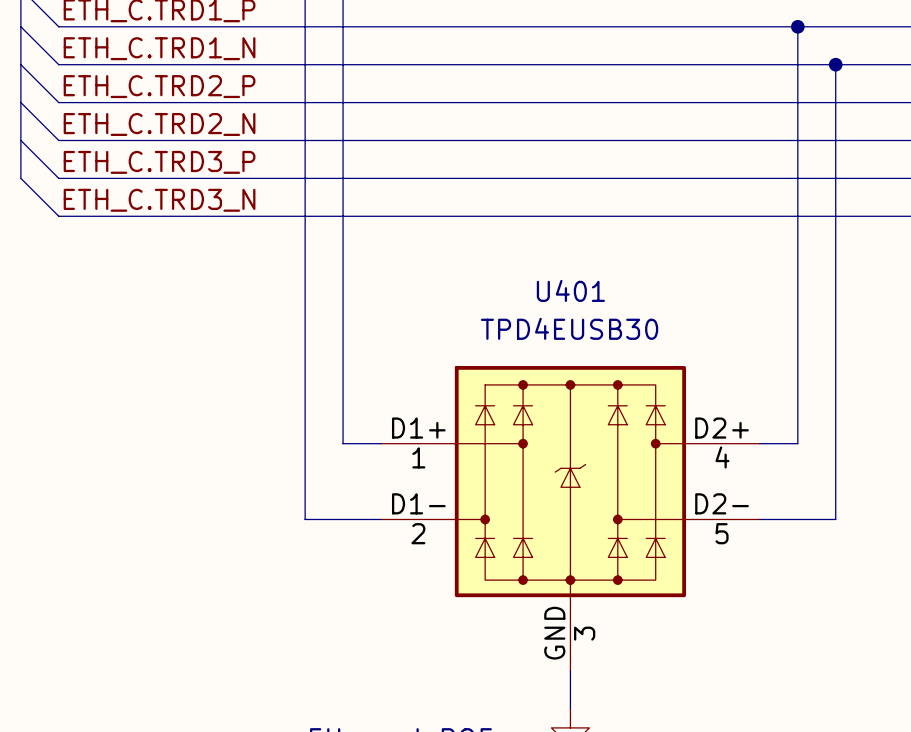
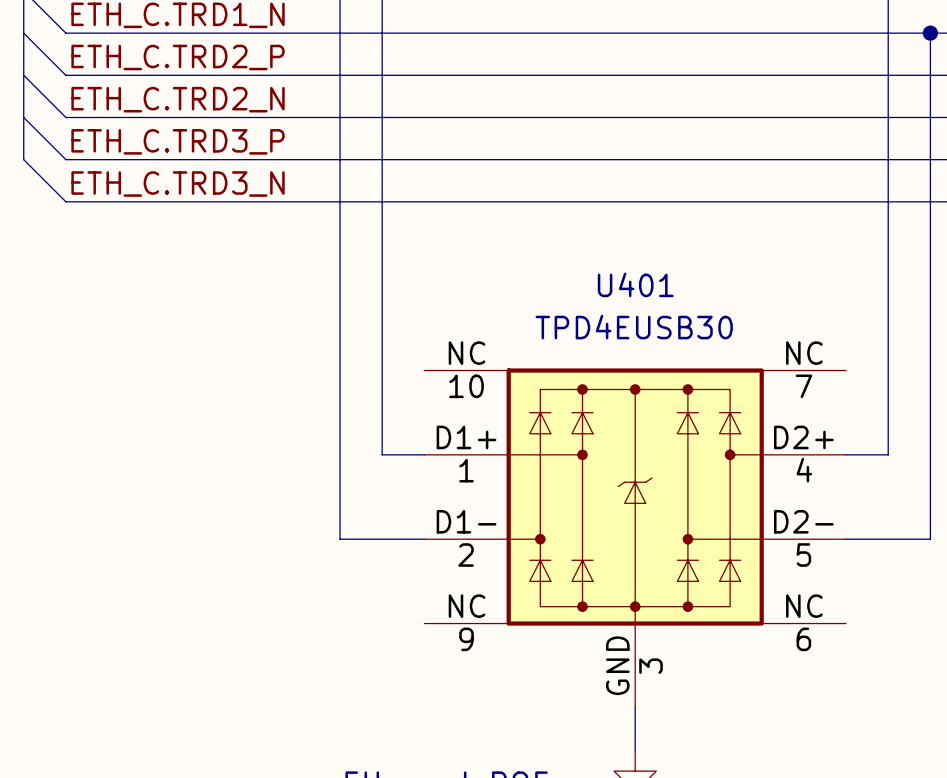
U401 symbol: [380, 365, 760, 672] -> [424, 368, 847, 708]

